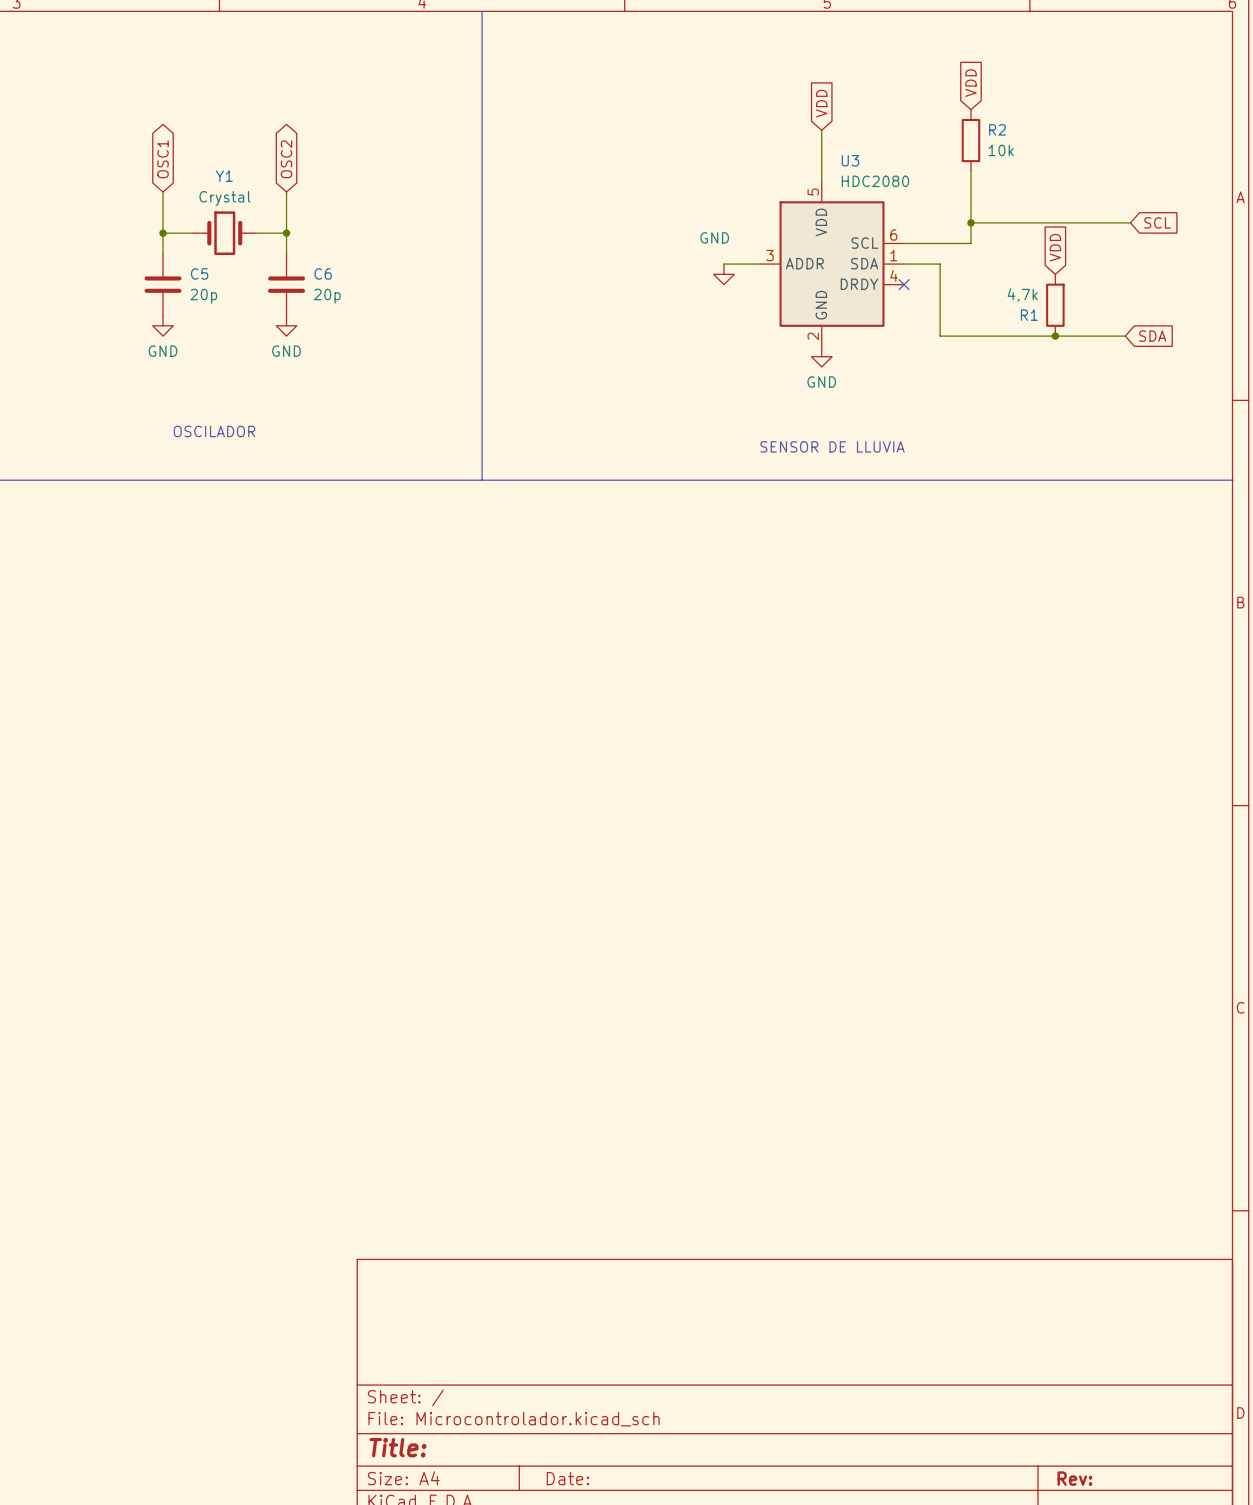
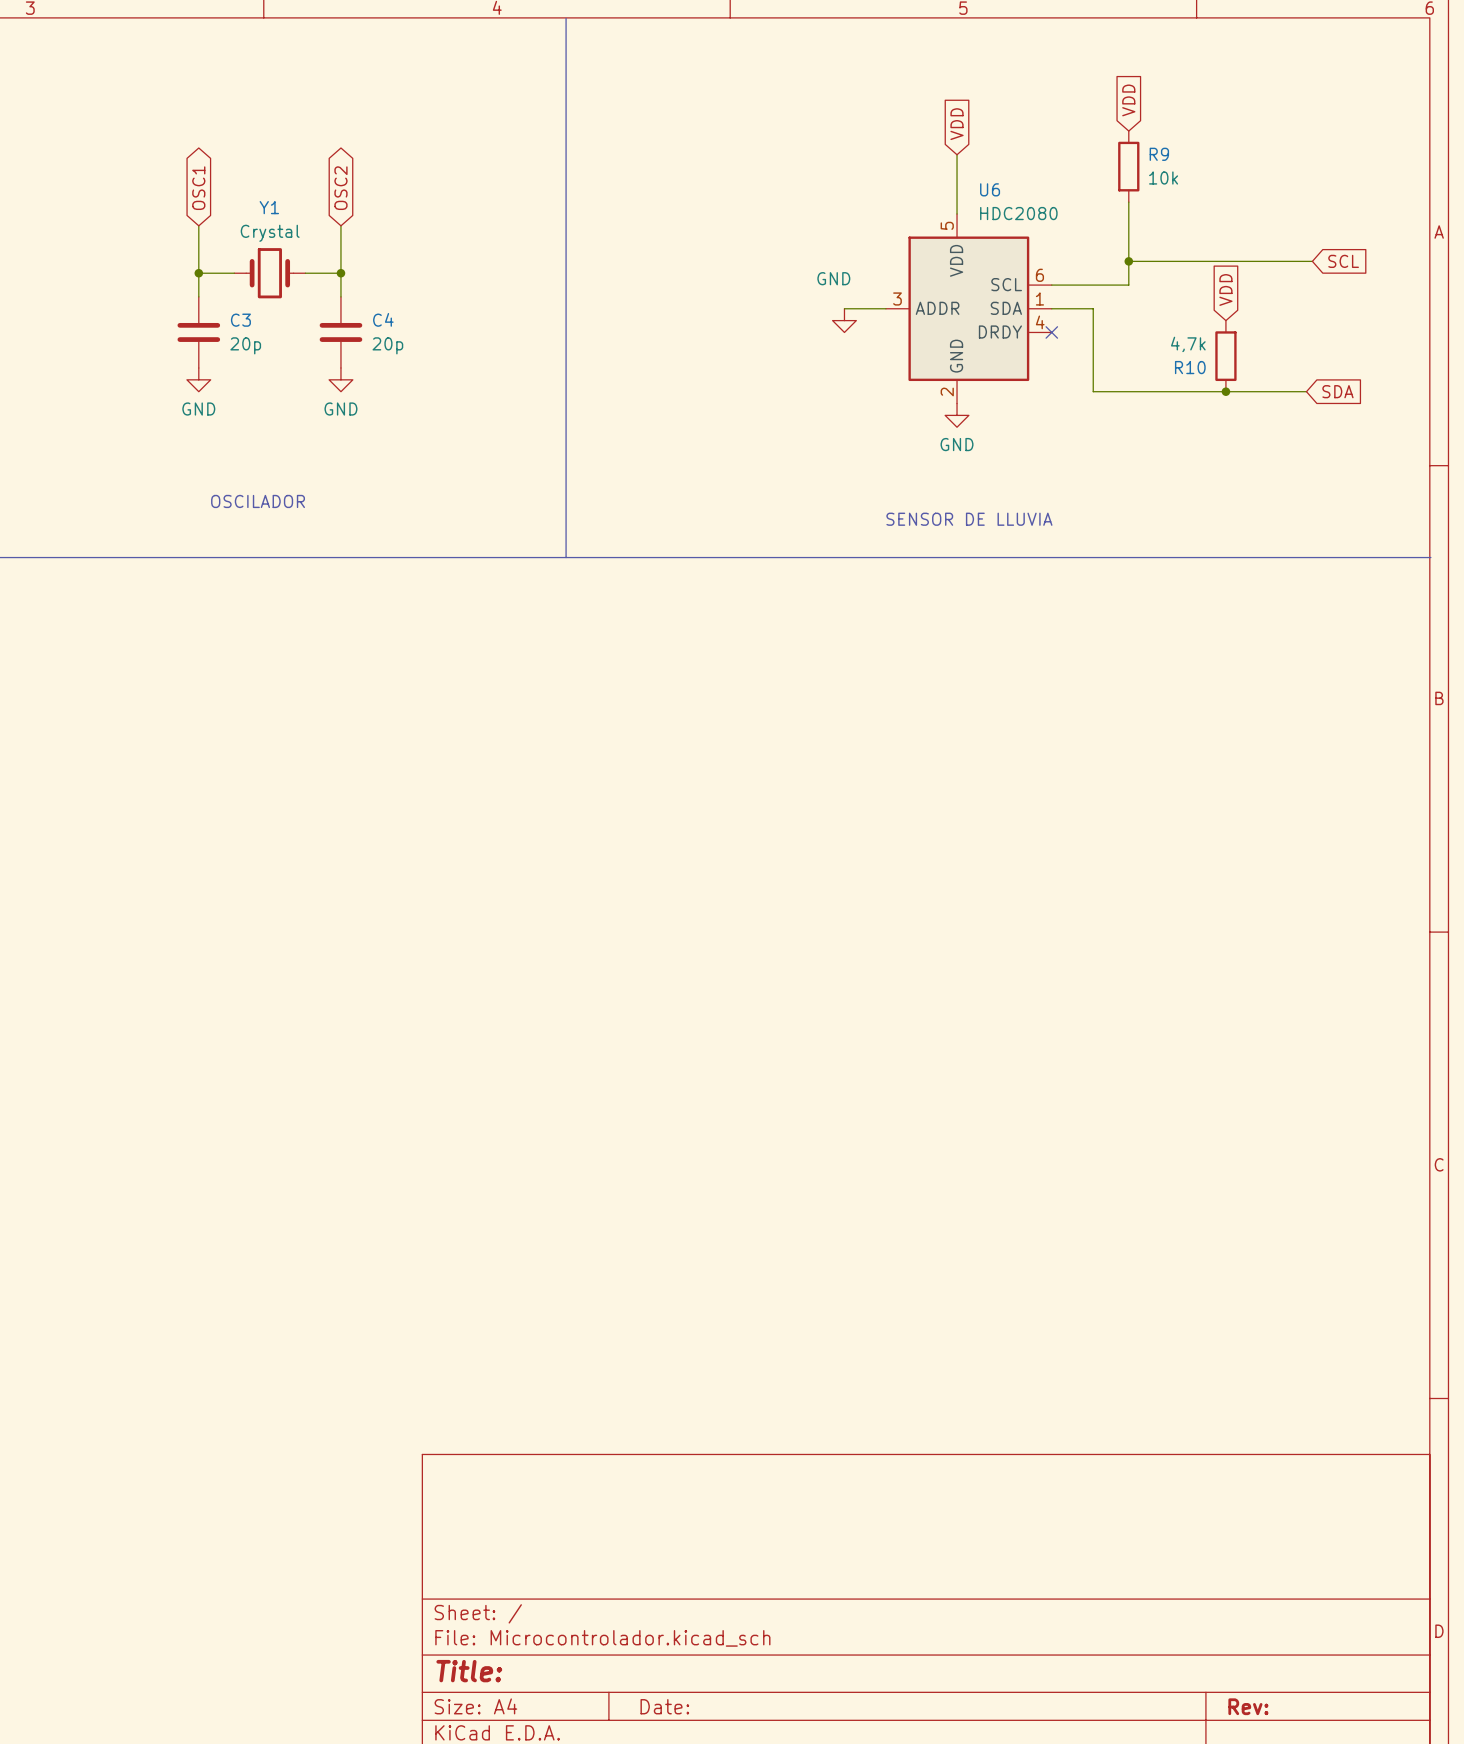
R2 name: R2 (997, 129) -> R9 (1159, 154)
U3 name: U3 (850, 160) -> U6 (990, 189)
C5 name: C5 (199, 273) -> C3 (240, 320)
C6 name: C6 (323, 273) -> C4 (383, 319)
R1 name: R1 (1029, 315) -> R10 (1190, 367)

